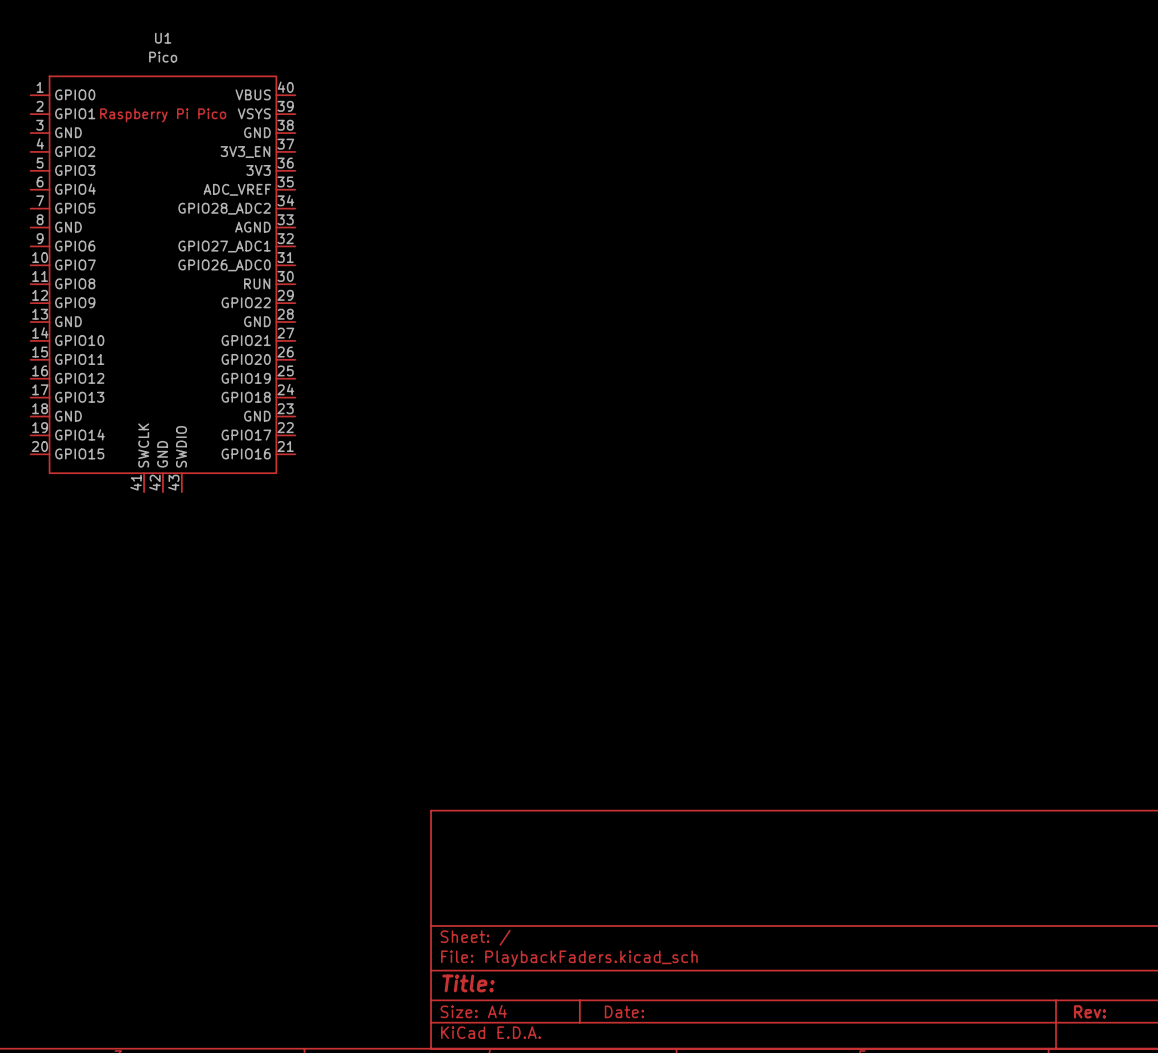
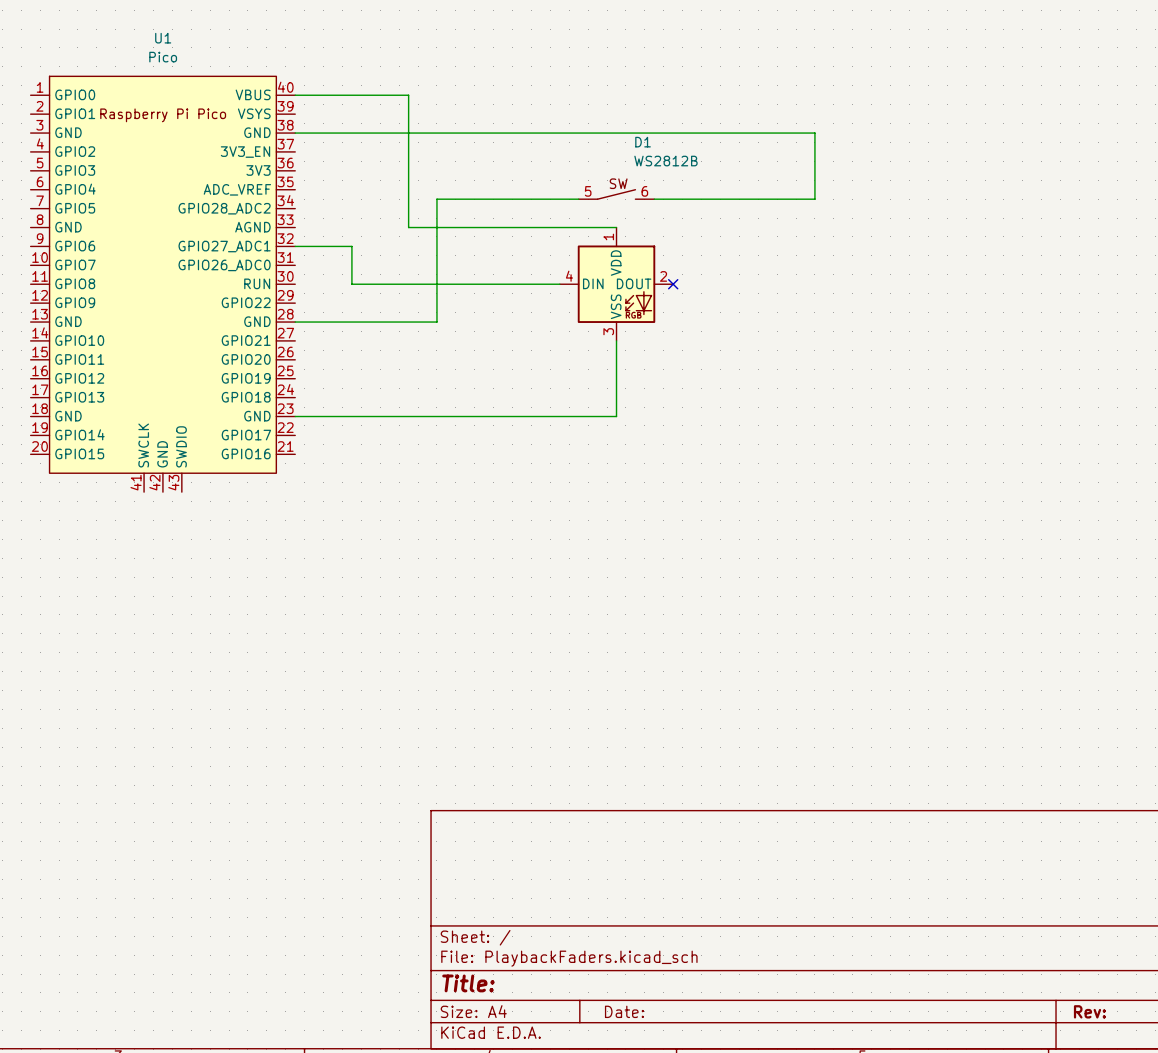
wire: none -> (295, 95) (408, 95) (408, 227) (616, 227)
wire: none -> (295, 133) (814, 133) (814, 199) (654, 199)
wire: none -> (578, 199) (436, 199) (436, 322) (295, 322)
wire: none -> (295, 246) (351, 246) (351, 284) (559, 284)
D1: none -> WS2812B (616, 265)
no-connect mark: none -> (673, 284)
wire: none -> (616, 340) (616, 416) (295, 416)

